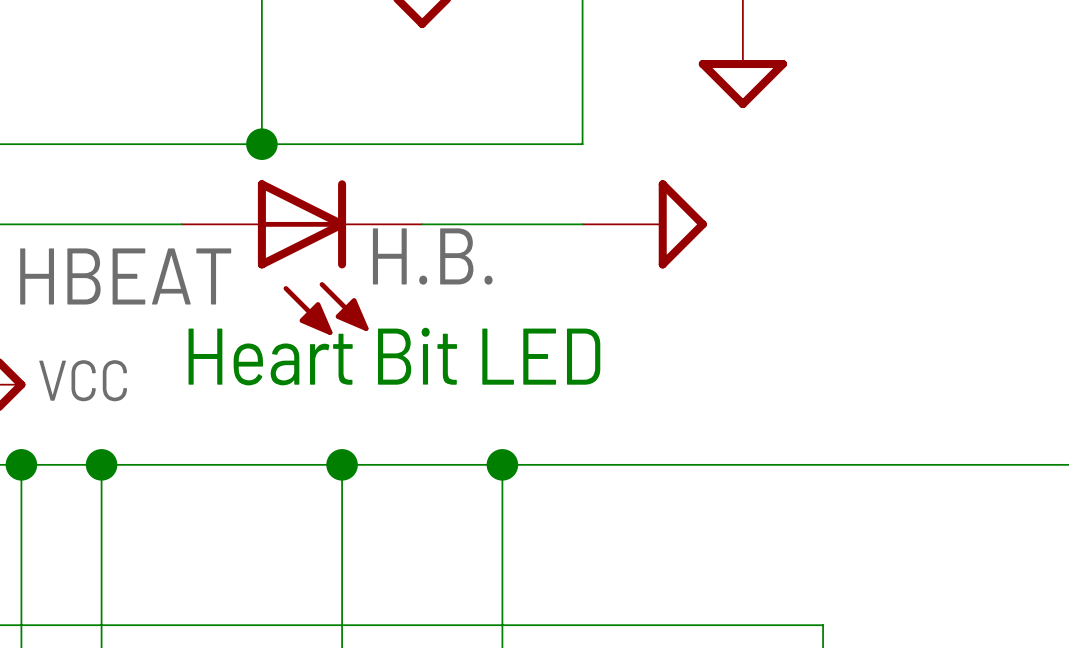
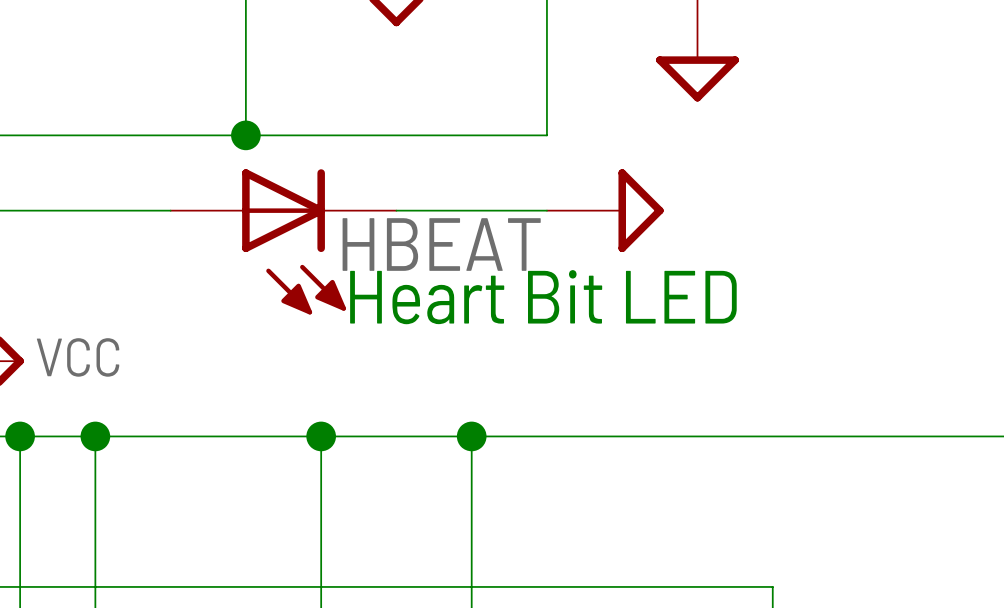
HBEAT value: H.B. (432, 256) -> none
HBEAT name position: HBEAT (125, 276) -> HBEAT (441, 244)
text position: Heart Bit LED (394, 356) -> Heart Bit LED (543, 297)

